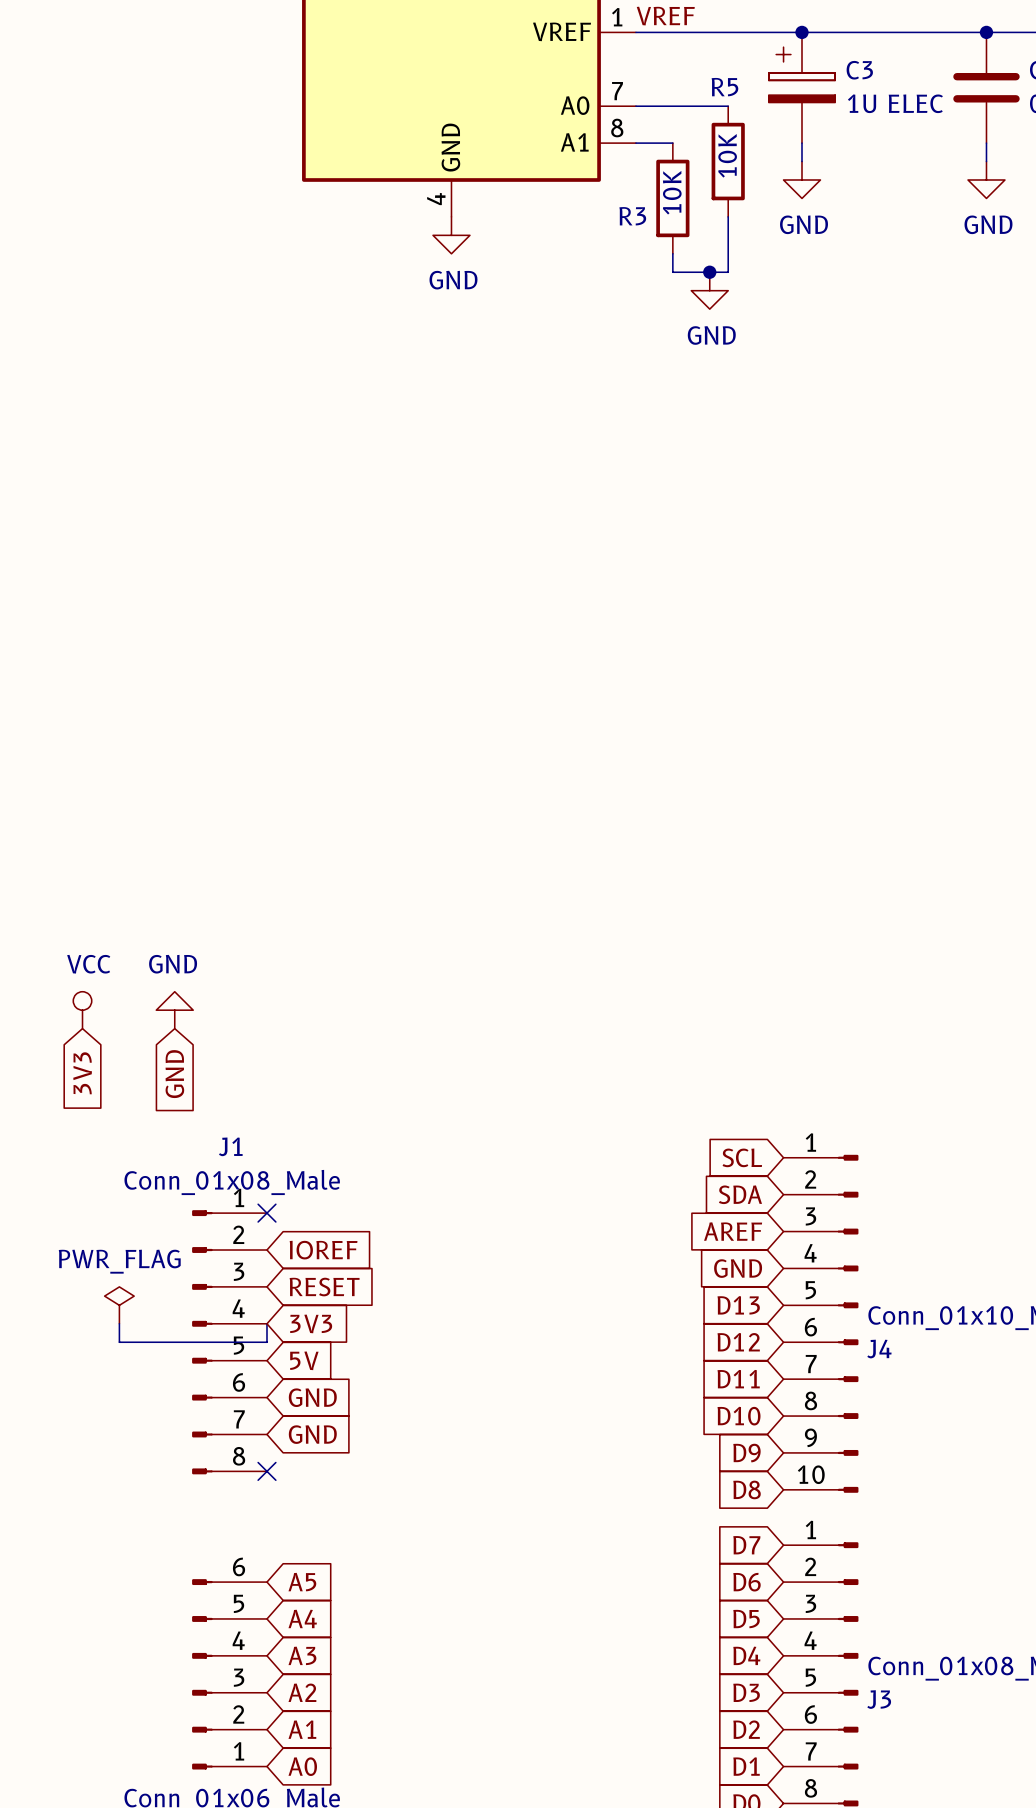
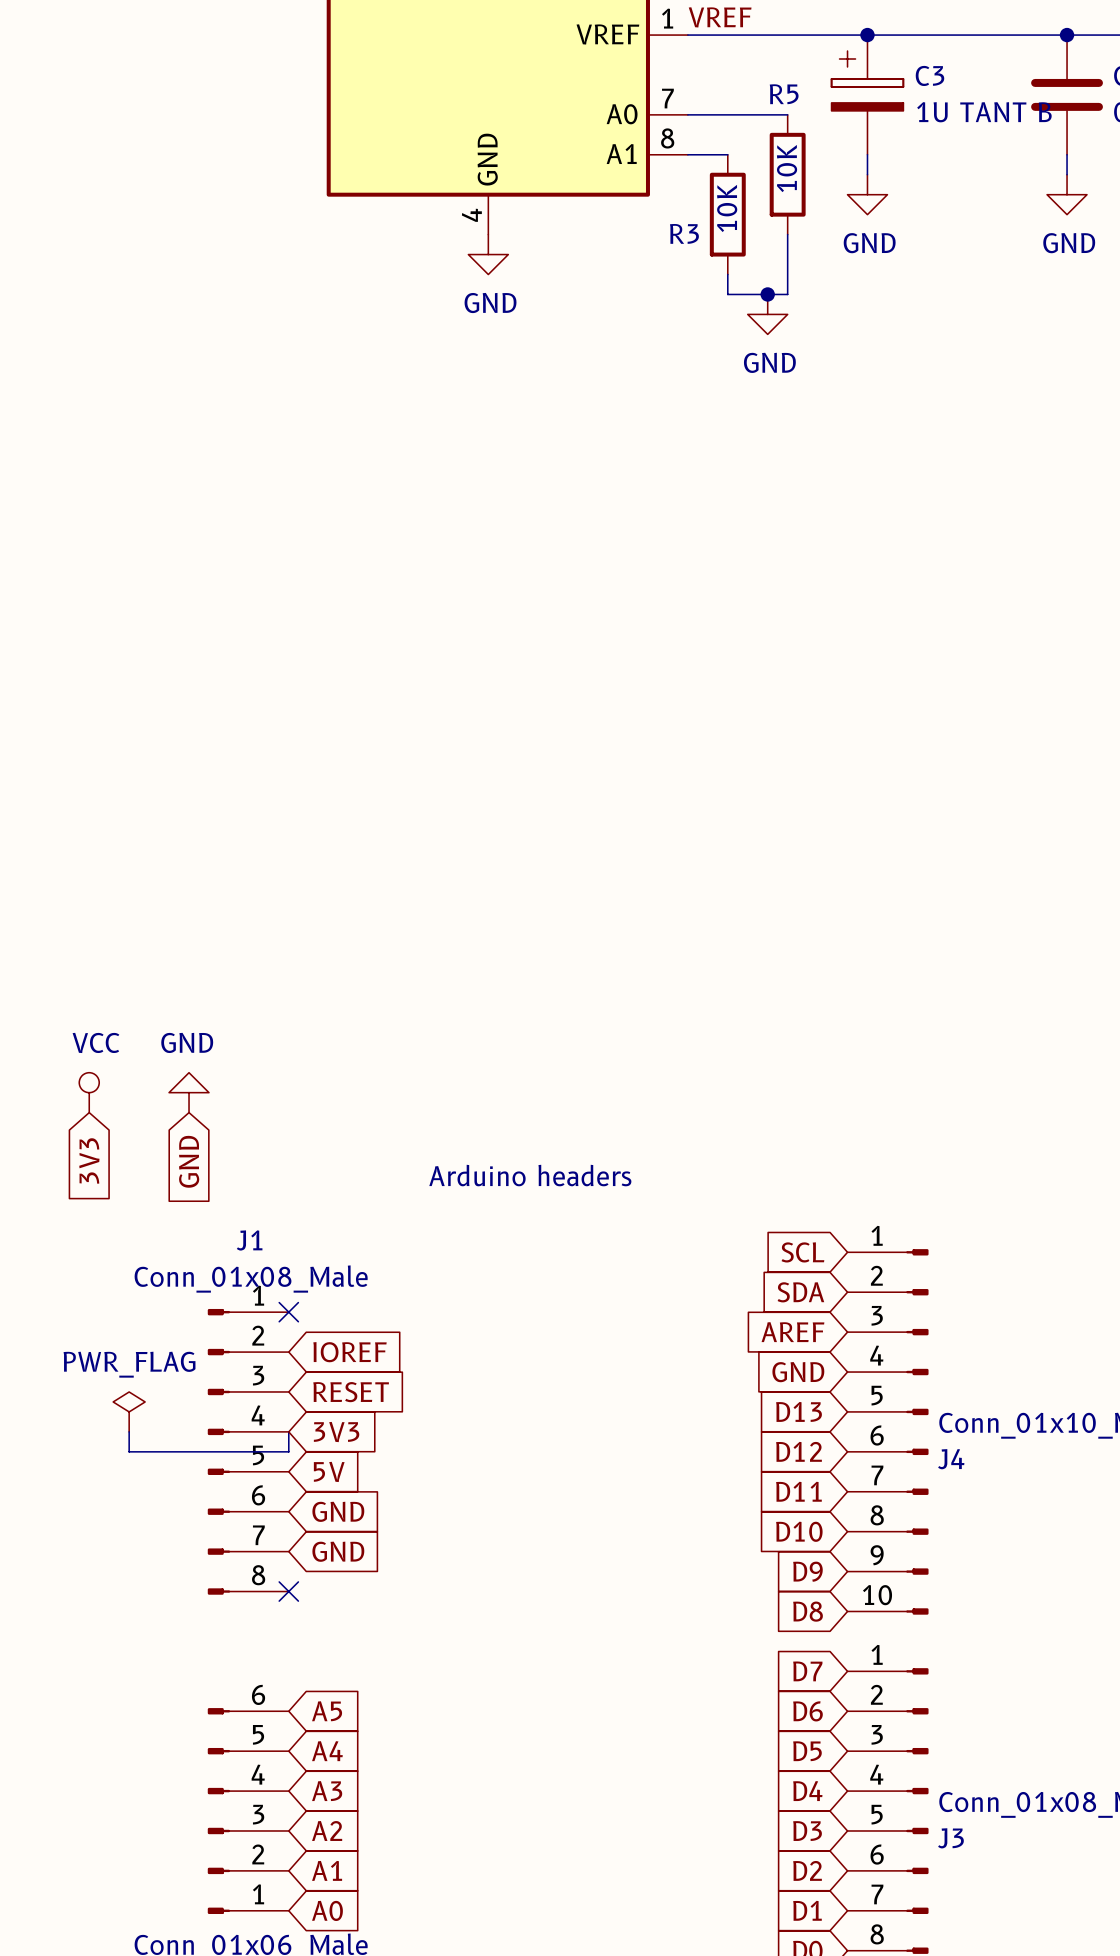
C3 value: 1U ELEC (895, 103) -> 1U TANT B (984, 112)
text: none -> Arduino headers (530, 1175)

